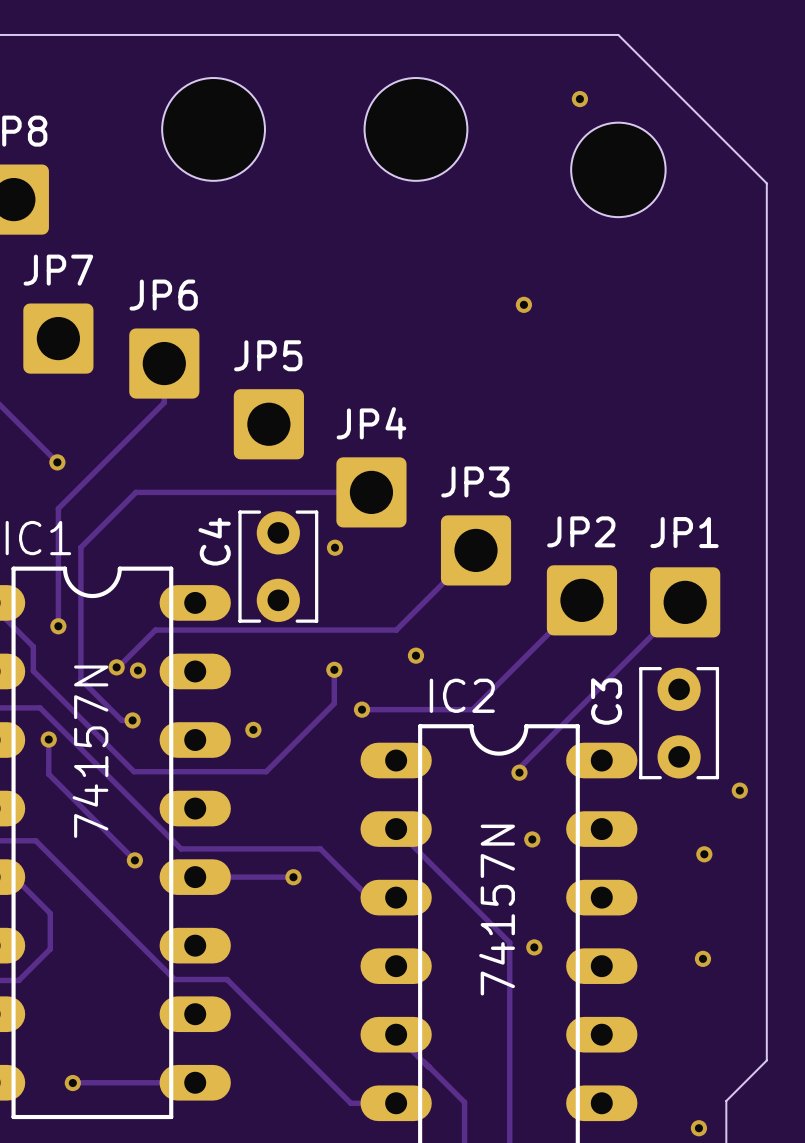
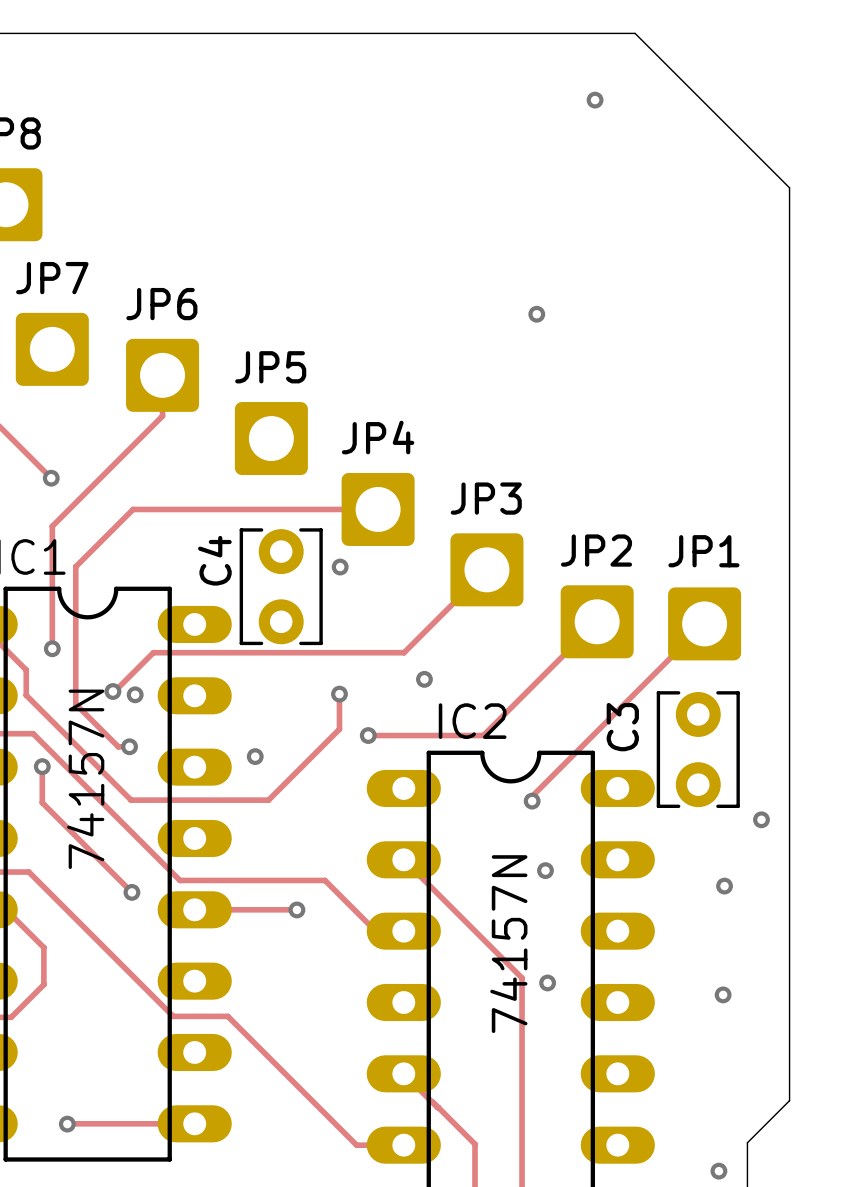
part: (213, 129) -> none
part: (415, 129) -> none
part: (618, 169) -> none

